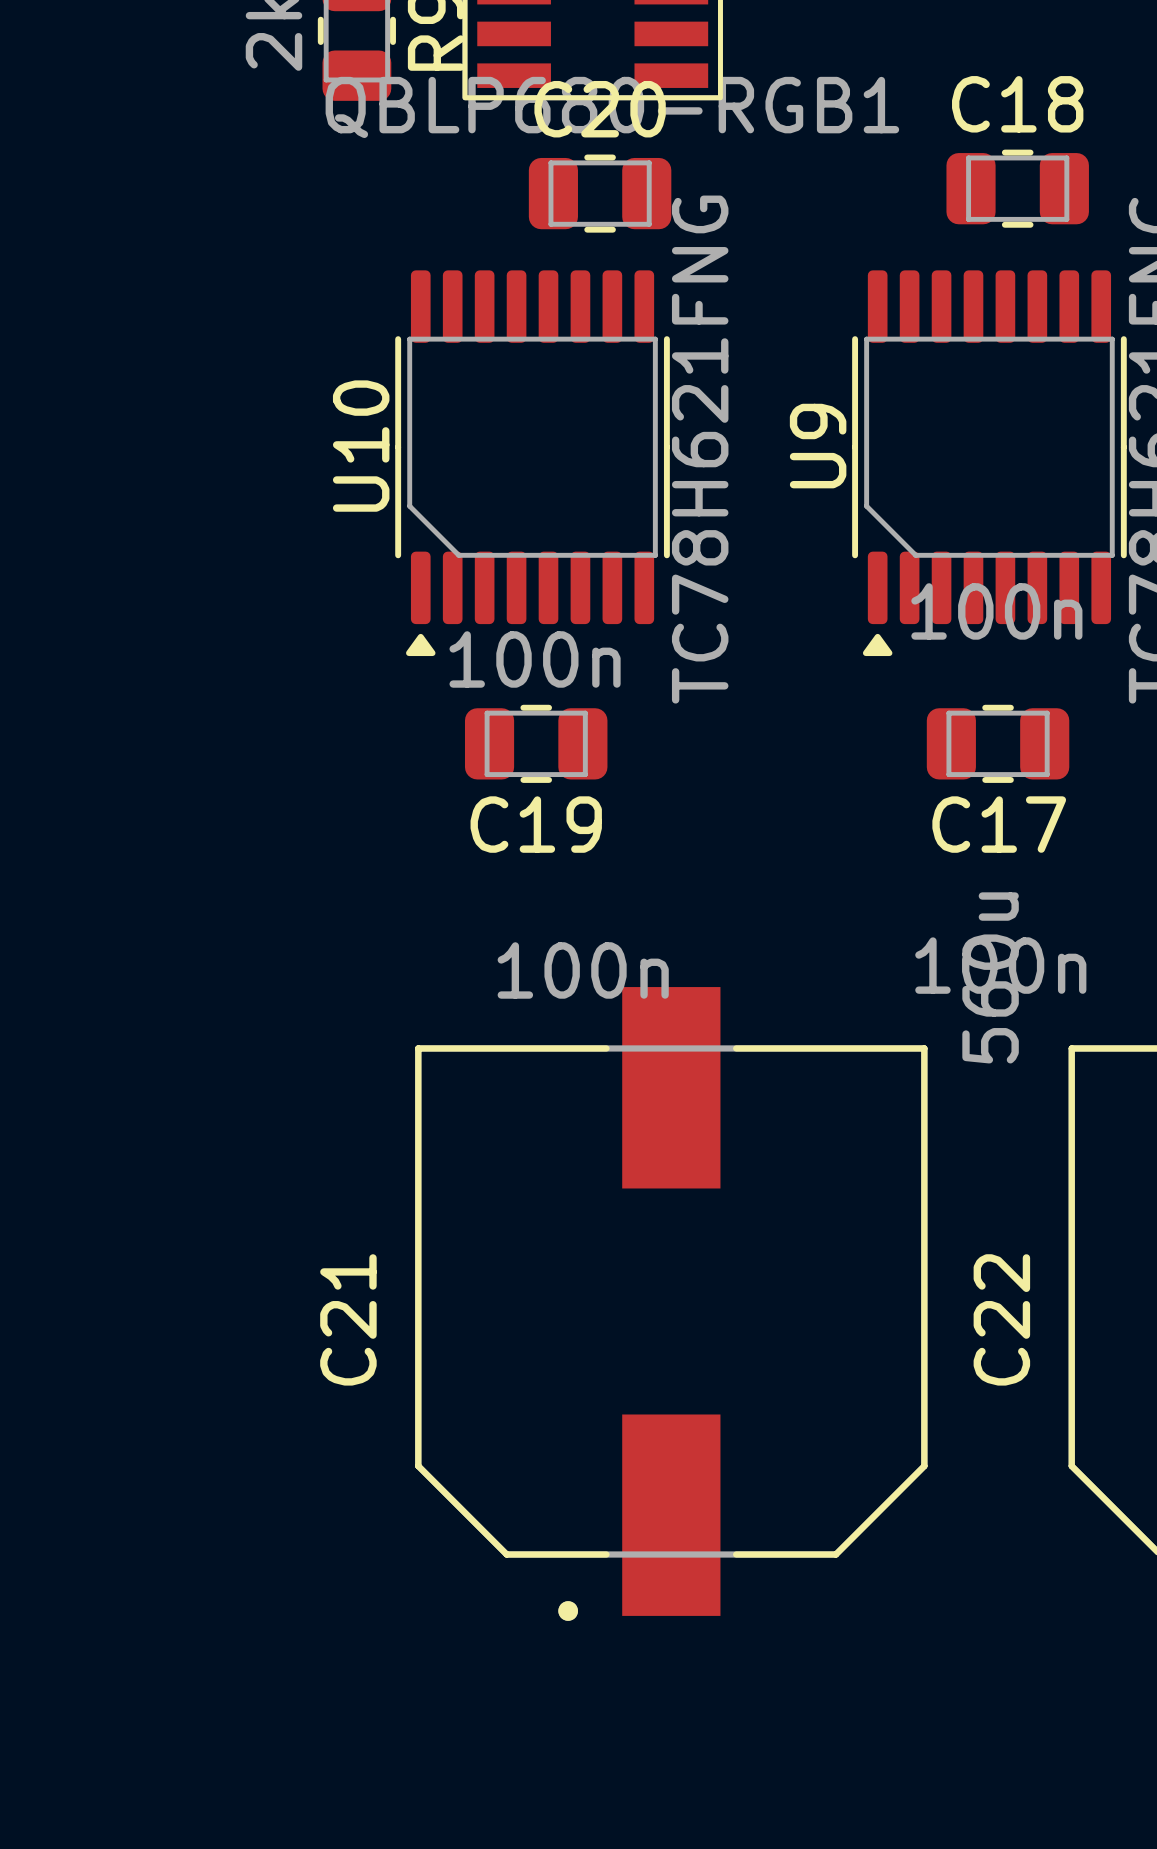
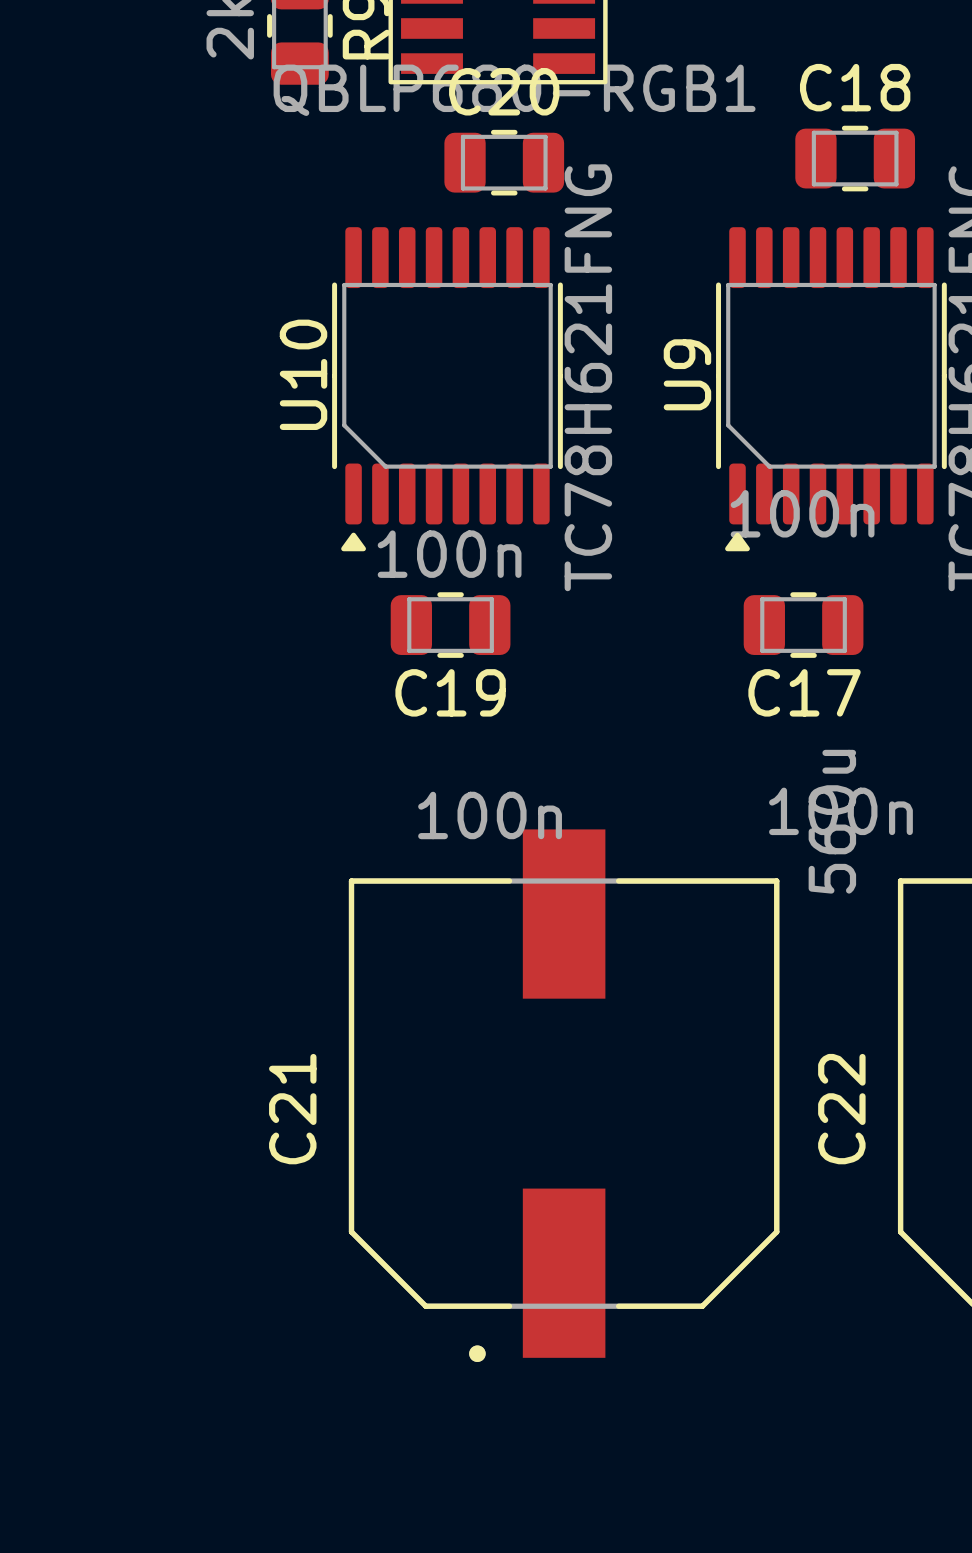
C17 position: (998, 743) -> (803, 625)

